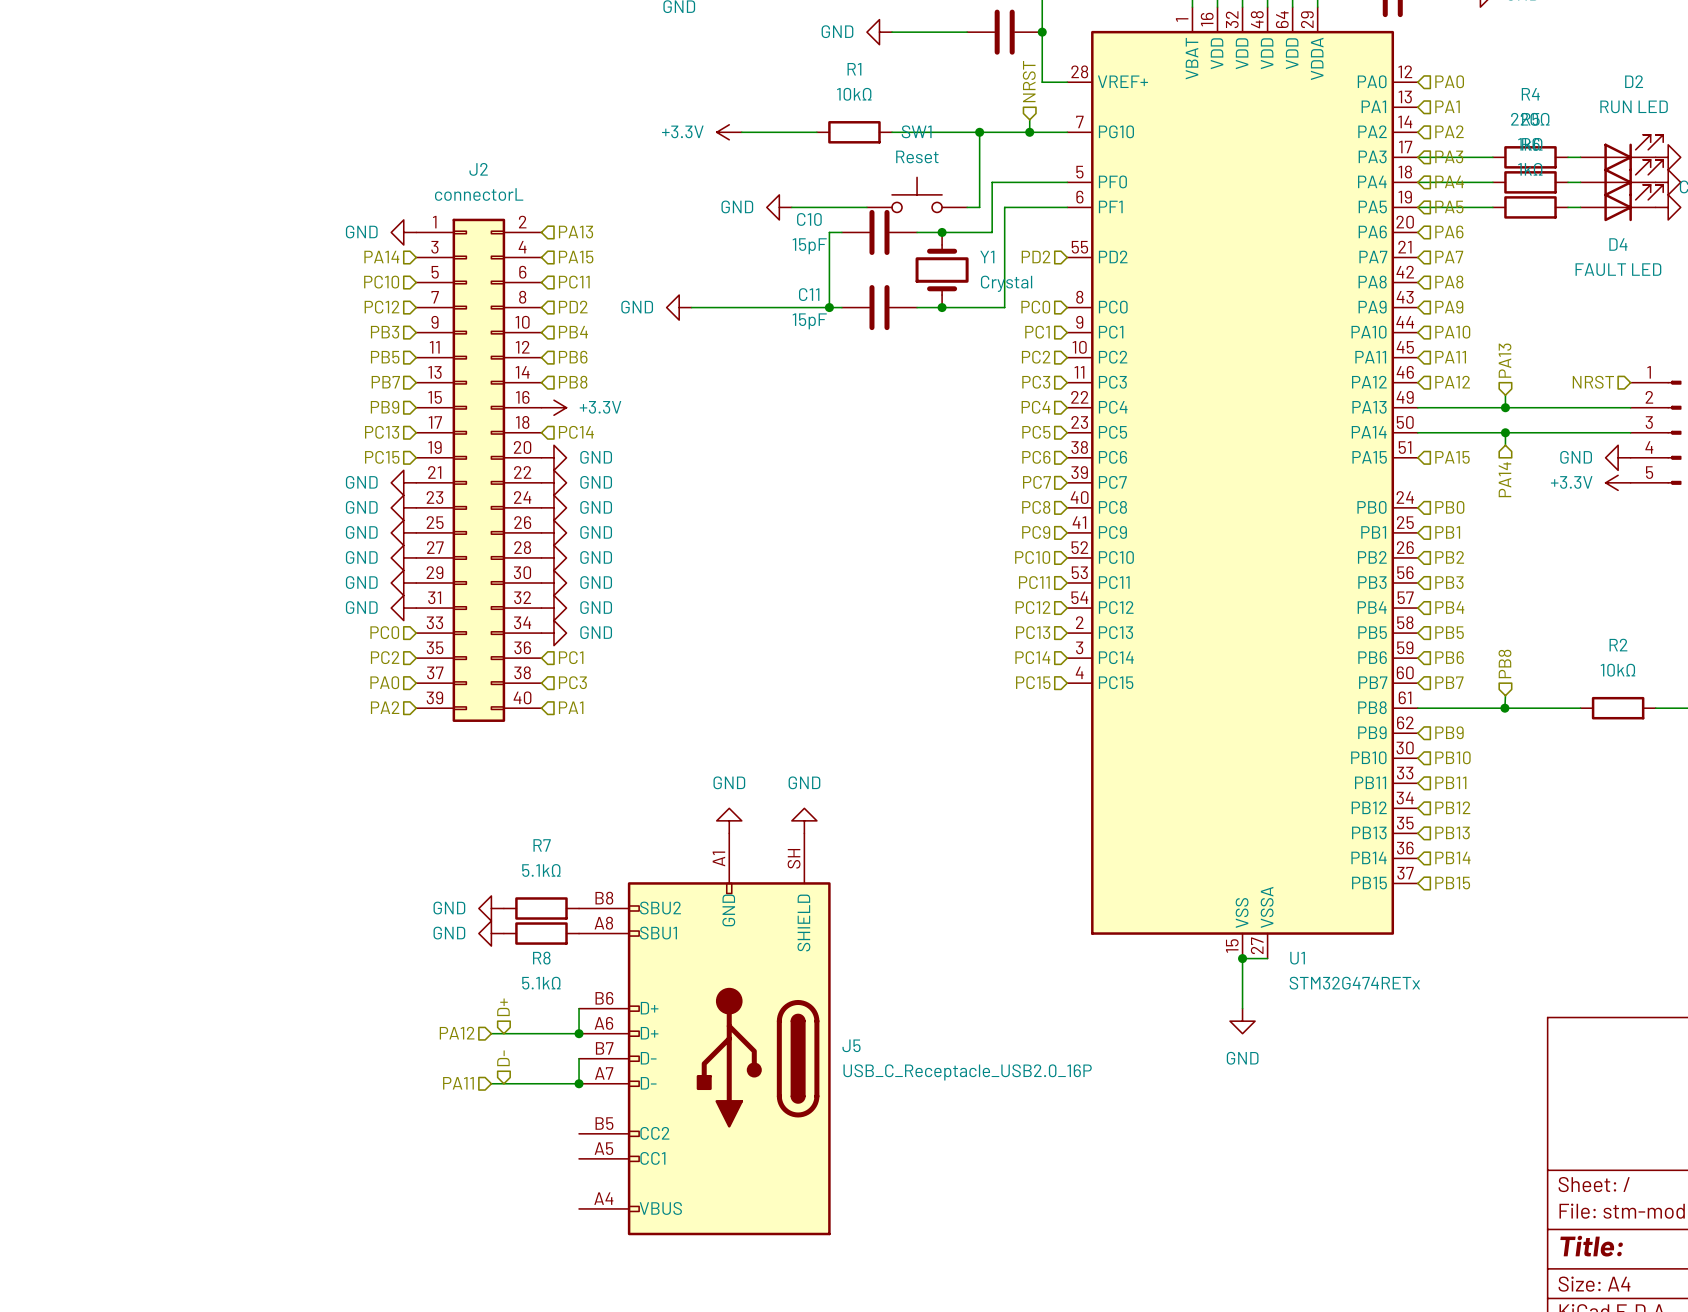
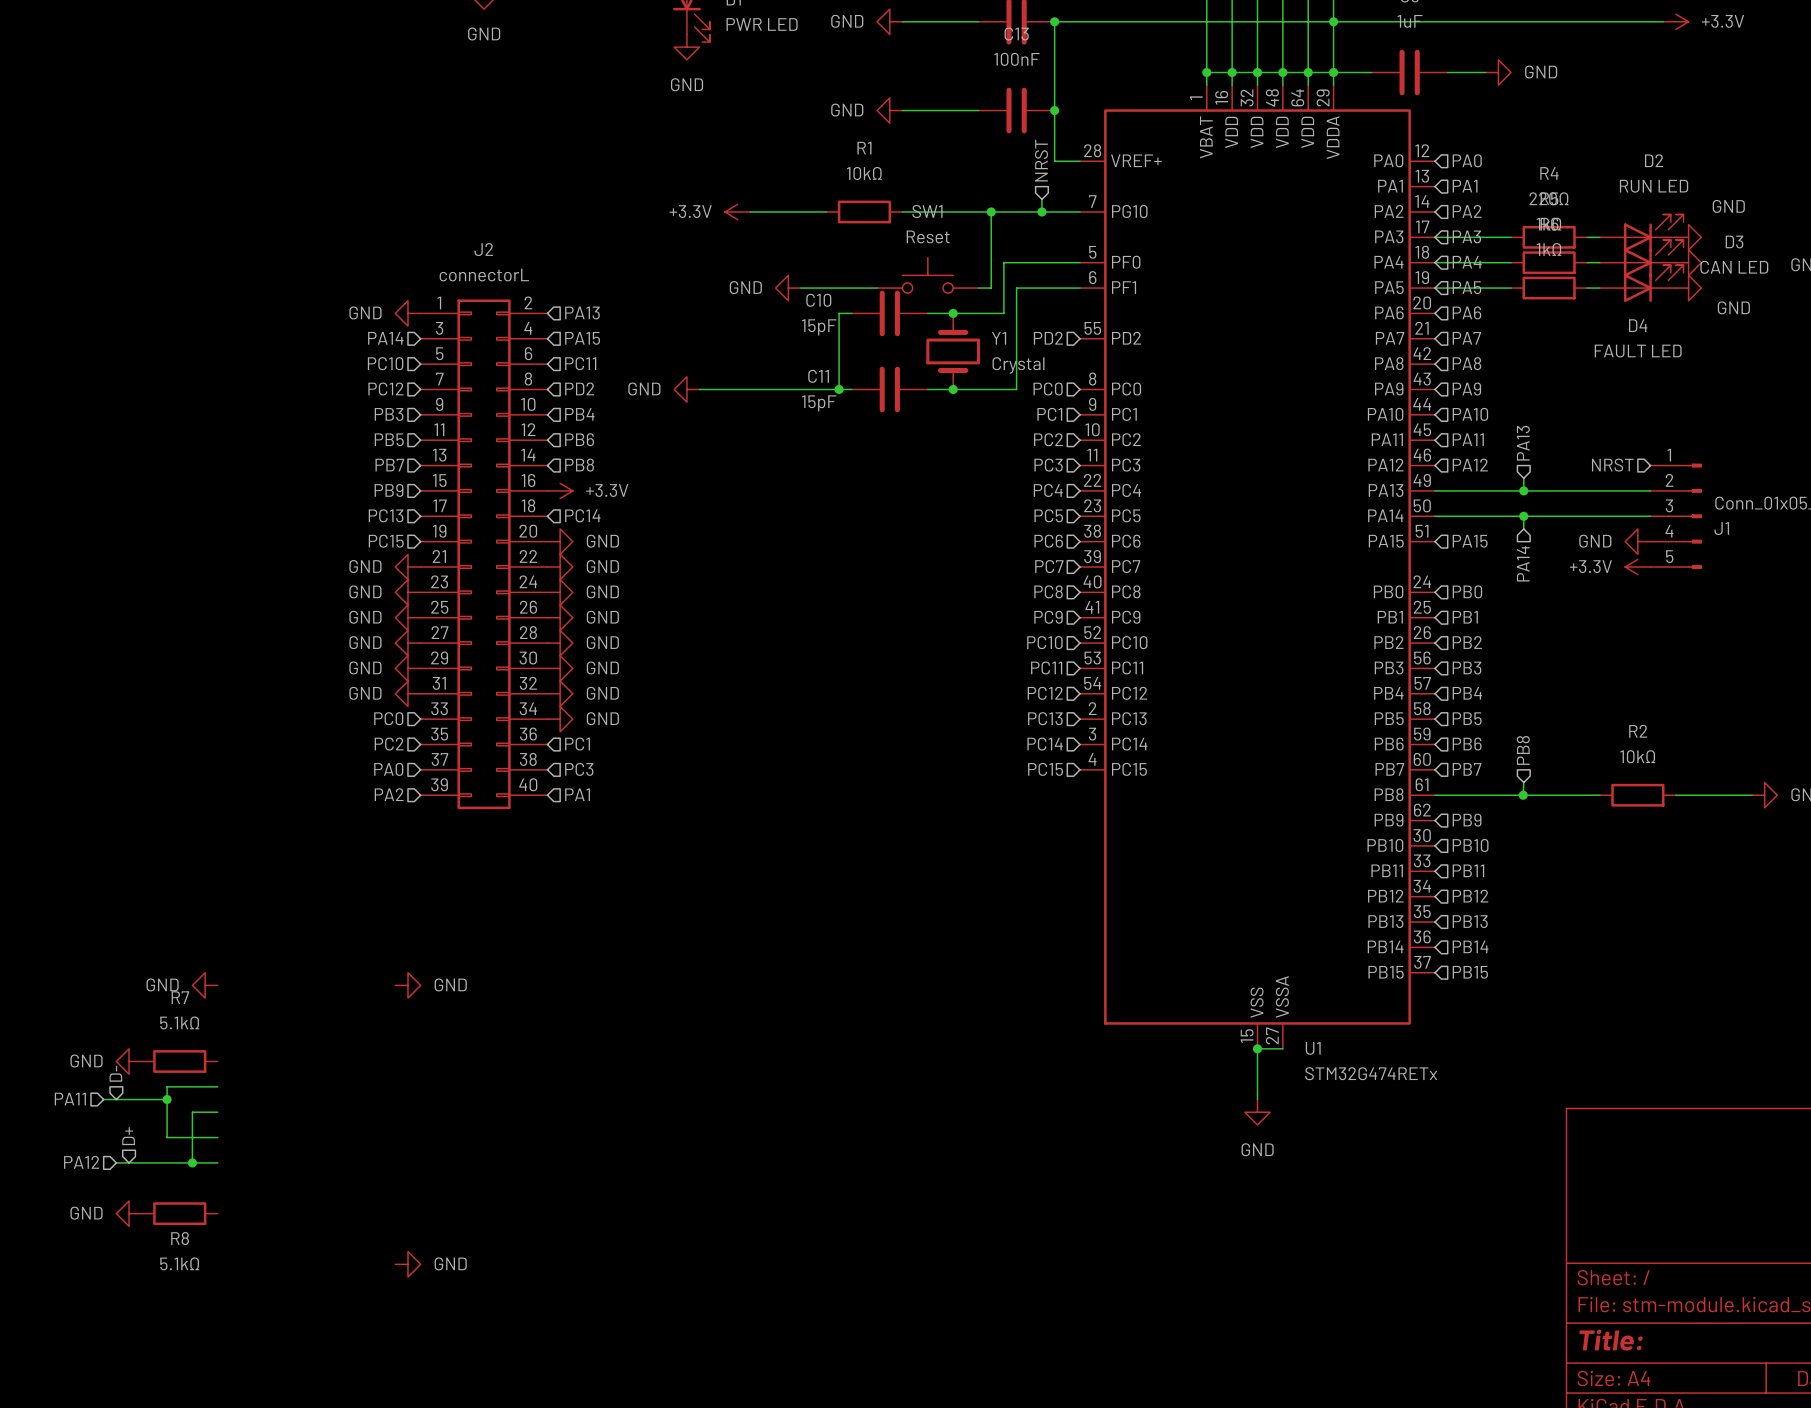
power symbol: GND (729, 820) -> none
power symbol: GND (804, 820) -> none
power symbol: none -> GND (205, 985)
power symbol: none -> GND (407, 985)
power symbol: GND (491, 908) -> none
R7 position: (541, 908) -> (179, 1061)
power symbol: GND (491, 933) -> none
R8 position: (541, 933) -> (179, 1213)
power symbol: none -> GND (129, 1061)
hierarchical label: none -> D- (115, 1073)
wire: none -> (217, 1086) (167, 1086) (167, 1137) (217, 1137)
hierarchical label: D+ (503, 1007) -> none
hierarchical label: none -> PA11 (70, 1099)
wire: none -> (103, 1099) (167, 1099)
junction: none -> (167, 1099)
wire: (579, 1008) (579, 1033) (491, 1033) -> none
wire: none -> (217, 1112) (192, 1112) (192, 1162)
hierarchical label: PA12 (457, 1033) -> none
junction: (579, 1033) -> none
J5: USB_C_Receptacle_USB2.0_16P (704, 1034) -> none
hierarchical label: none -> D+ (128, 1136)
hierarchical label: D- (503, 1058) -> none
wire: (579, 1058) (579, 1083) (491, 1083) -> none
hierarchical label: none -> PA12 (81, 1162)
wire: none -> (116, 1162) (217, 1162)
junction: none -> (192, 1162)
hierarchical label: PA11 (458, 1083) -> none
junction: (579, 1083) -> none
power symbol: none -> GND (129, 1213)
power symbol: none -> GND (407, 1264)

